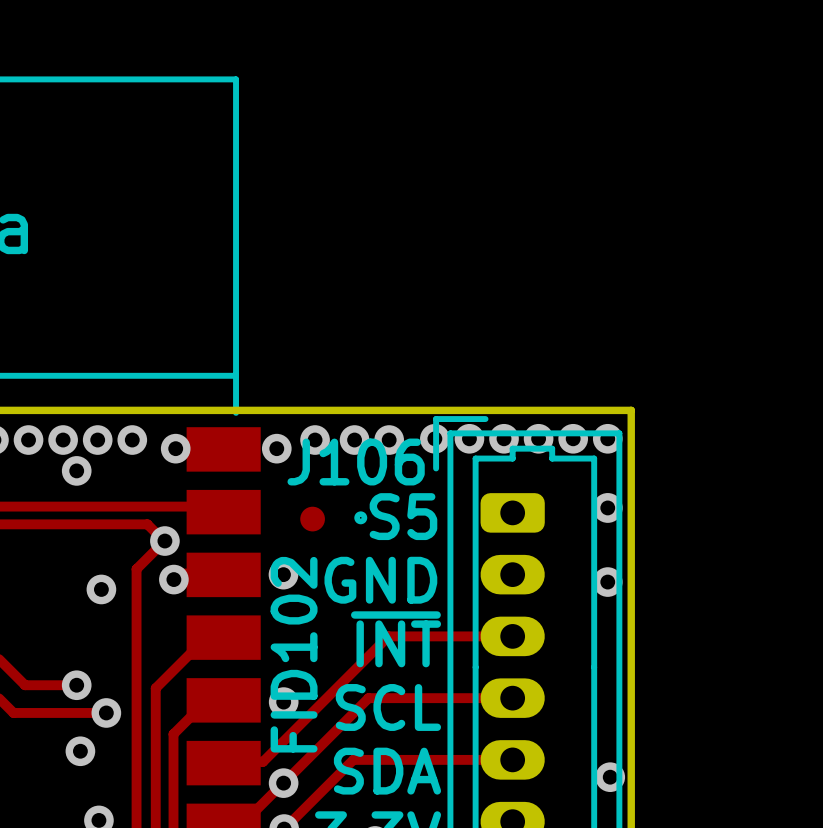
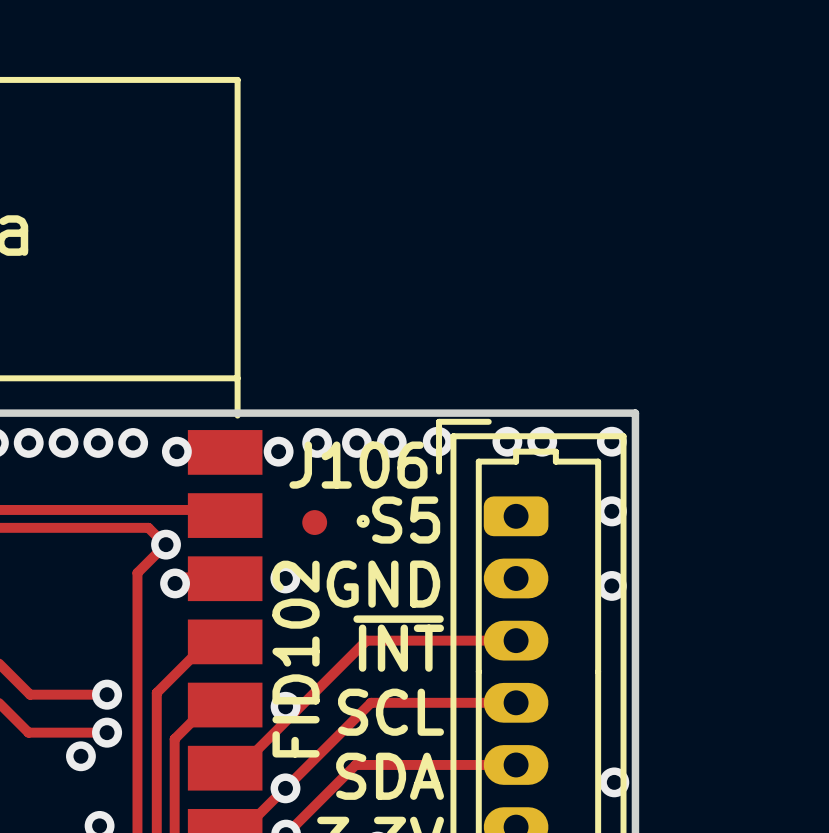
via: (469, 438) -> none
via: (573, 438) -> none
via: (76, 470) -> none
via: (101, 589) -> none
track: (388, 636) (263, 761) (238, 761) -> (391, 640) (366, 640) (240, 766)
track: (25, 685) (76, 685) -> (25, 689) (30, 694) (107, 694)
via: (76, 685) -> none
via: none -> (107, 694)
track: (13, 712) (106, 712) -> (13, 717) (28, 732) (107, 732)
via: (106, 712) -> none
via: none -> (107, 732)

